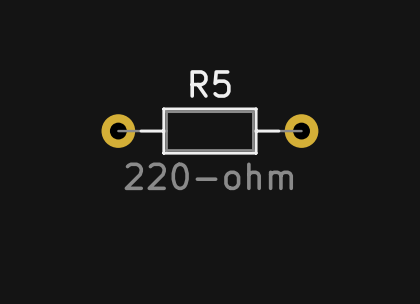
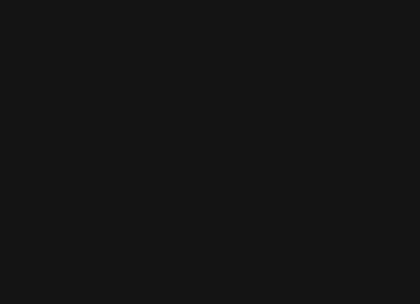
R5: 220-ohm (209, 131) -> none

